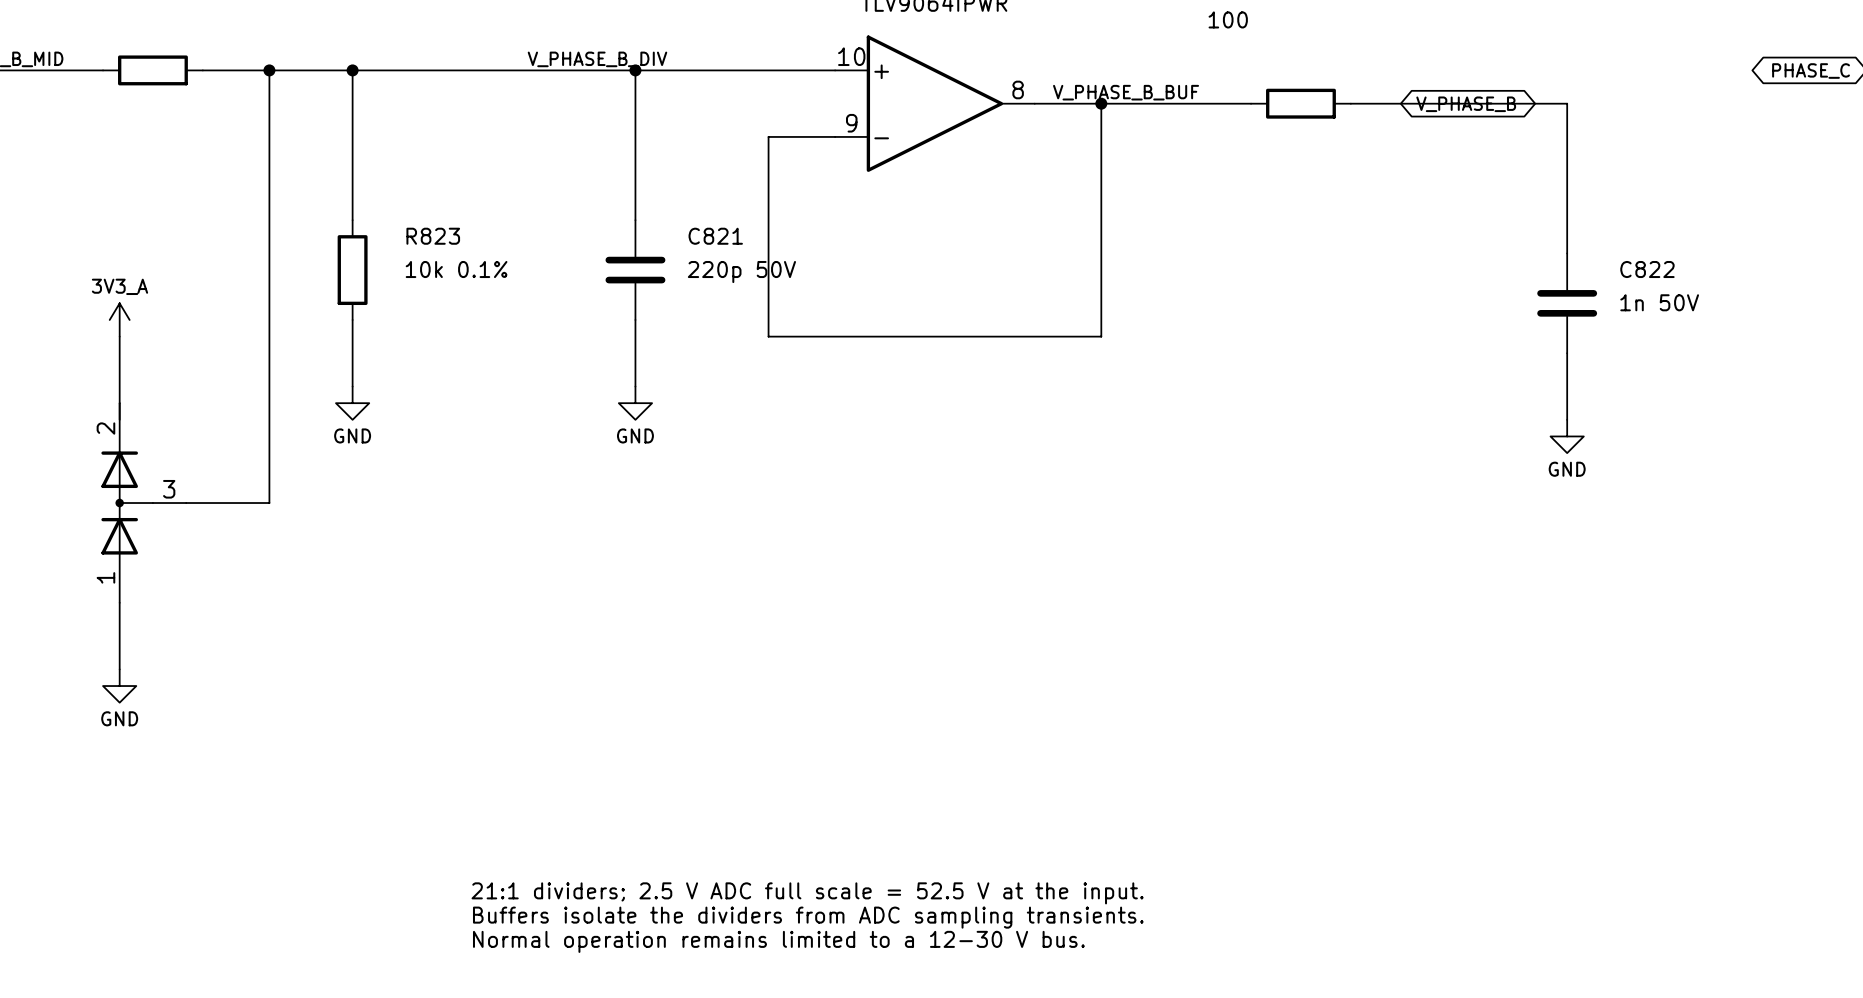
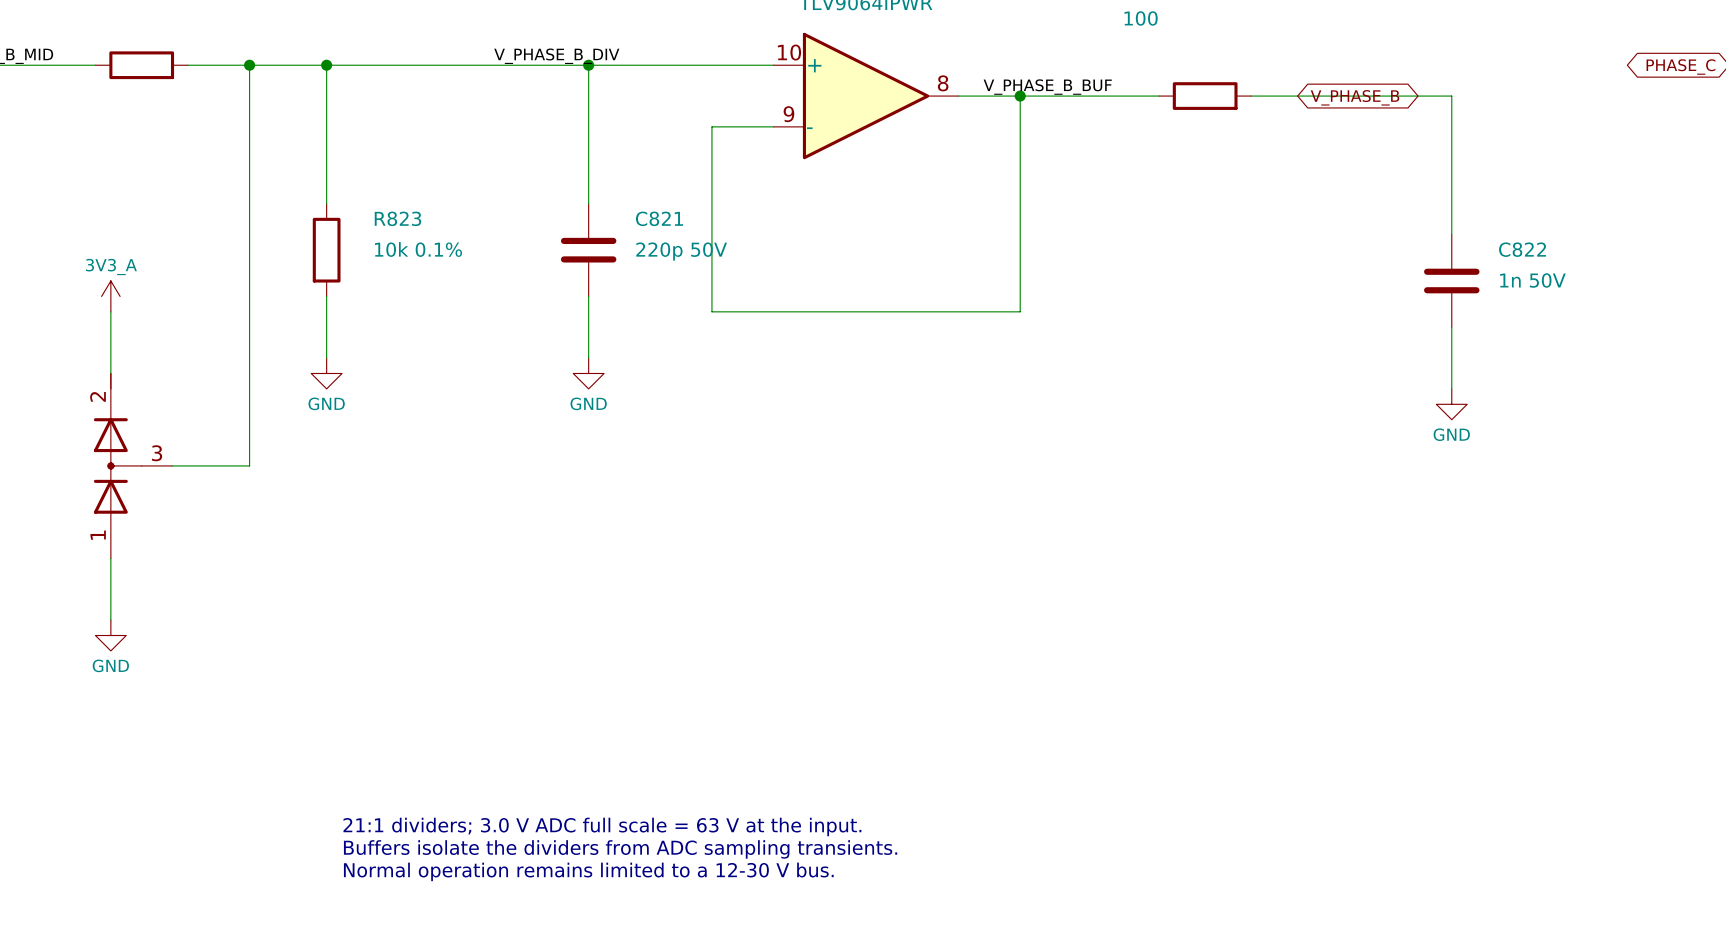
text: 21:1 dividers; 2.5 V ADC full scale = 52.5 V at the input. (807, 893) -> 21:1 dividers; 3.0 V ADC full scale = 63 V at the input. (602, 826)
text position: Buffers isolate the dividers from ADC sampling transients. (808, 917) -> Buffers isolate the dividers from ADC sampling transients. (620, 849)
text position: Normal operation remains limited to a 12-30 V bus. (778, 941) -> Normal operation remains limited to a 12-30 V bus. (588, 871)

